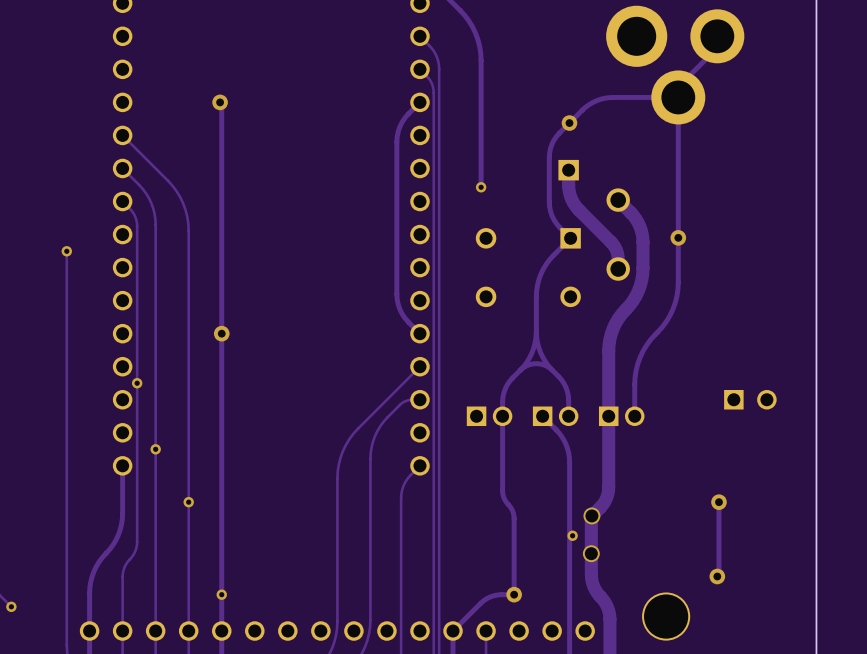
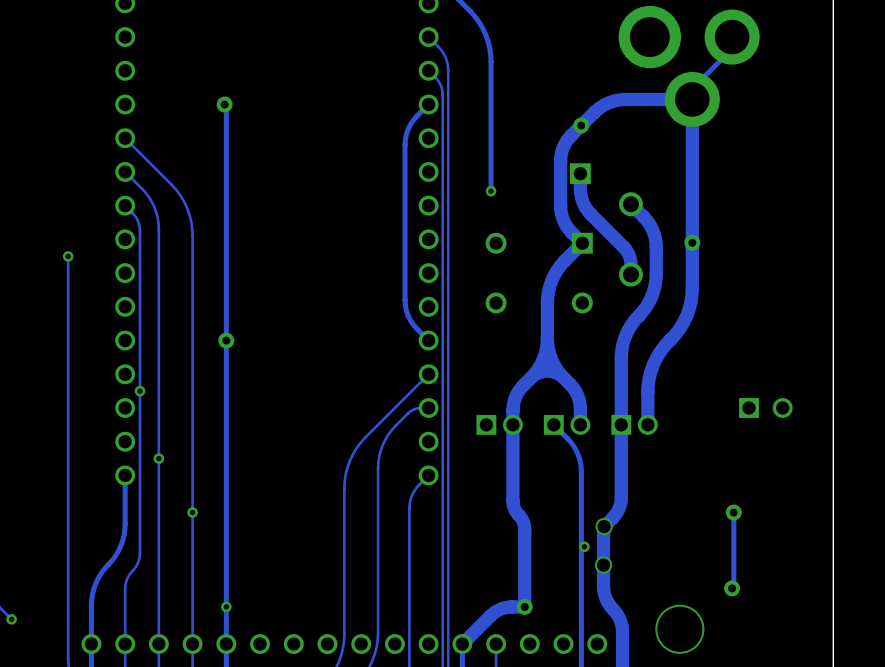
track width: thin (673, 97) (613, 97) (596, 100) (582, 110) (553, 140) (549, 157) (549, 206) (554, 220) (570, 238) (549, 259) (540, 274) (536, 291) (536, 331) -> thick (686, 99) (625, 99) (608, 102) (594, 112) (565, 143) (560, 160) (560, 210) (565, 224) (582, 243) (560, 265) (551, 280) (547, 297) (547, 338)
track width: thin (678, 102) (677, 289) (669, 315) (646, 345) (637, 363) (635, 377) (634, 416) -> thick (692, 104) (691, 295) (683, 322) (660, 352) (650, 371) (648, 385) (647, 424)
track width: thin (536, 331) (532, 352) (520, 370) -> thick (547, 338) (543, 359) (530, 378)
track width: thin (536, 331) (540, 352) (552, 370) -> thick (547, 338) (551, 359) (563, 378)
track width: thin (520, 370) (507, 385) (502, 402) (502, 490) (504, 498) (511, 509) (514, 516) (514, 594) (498, 594) (487, 598) (453, 631) -> thick (530, 378) (517, 393) (512, 410) (512, 500) (514, 508) (522, 519) (524, 527) (524, 606) (509, 607) (497, 610) (462, 644)
track width: thin (552, 370) (566, 387) (568, 414) -> thick (563, 378) (577, 395) (580, 404) (580, 423)
track width: thin (552, 370) (543, 364) (536, 363) (528, 364) (520, 370) -> thick (563, 378) (555, 372) (547, 371) (539, 372) (530, 378)

